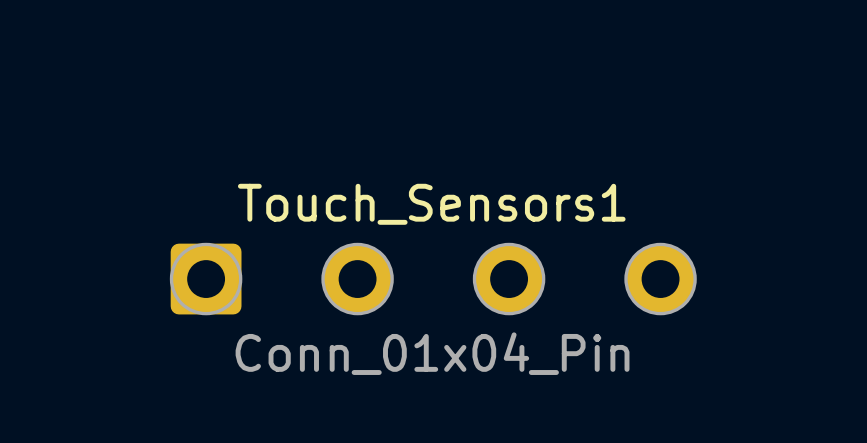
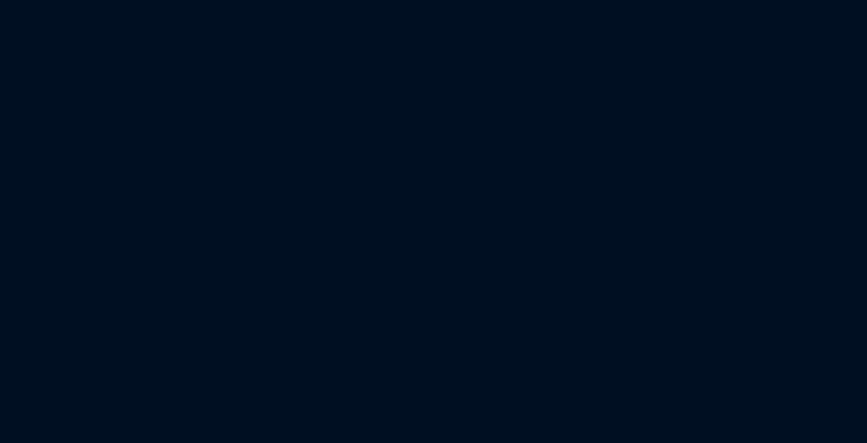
Touch_Sensors1: Conn_01x04_Pin (433, 279) -> none

